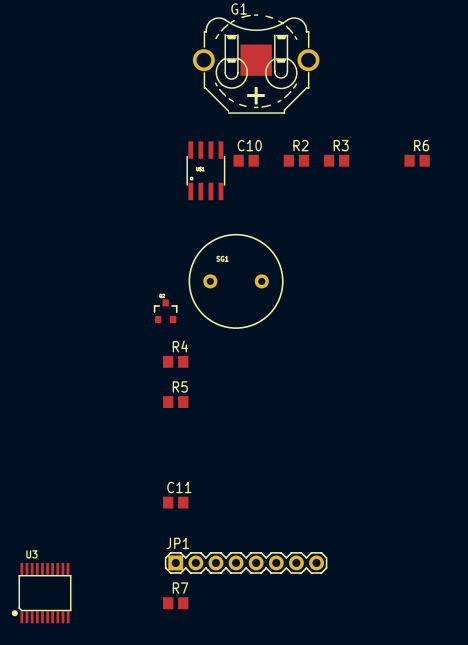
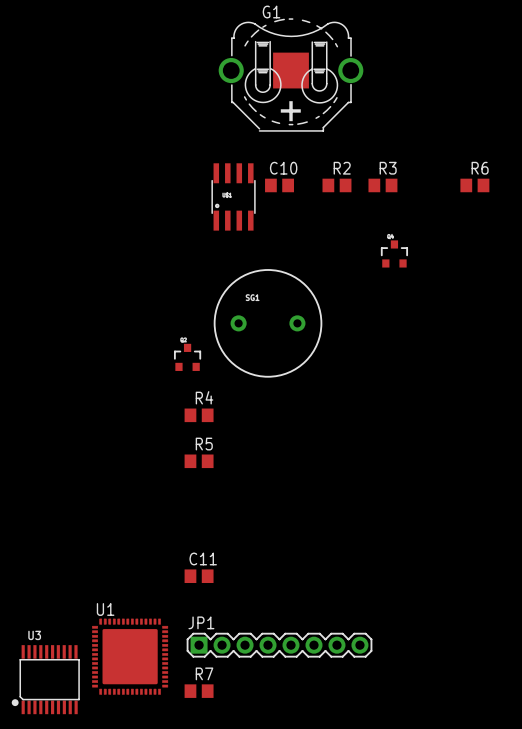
part: none -> (394, 253)
U1: none -> (130, 656)

